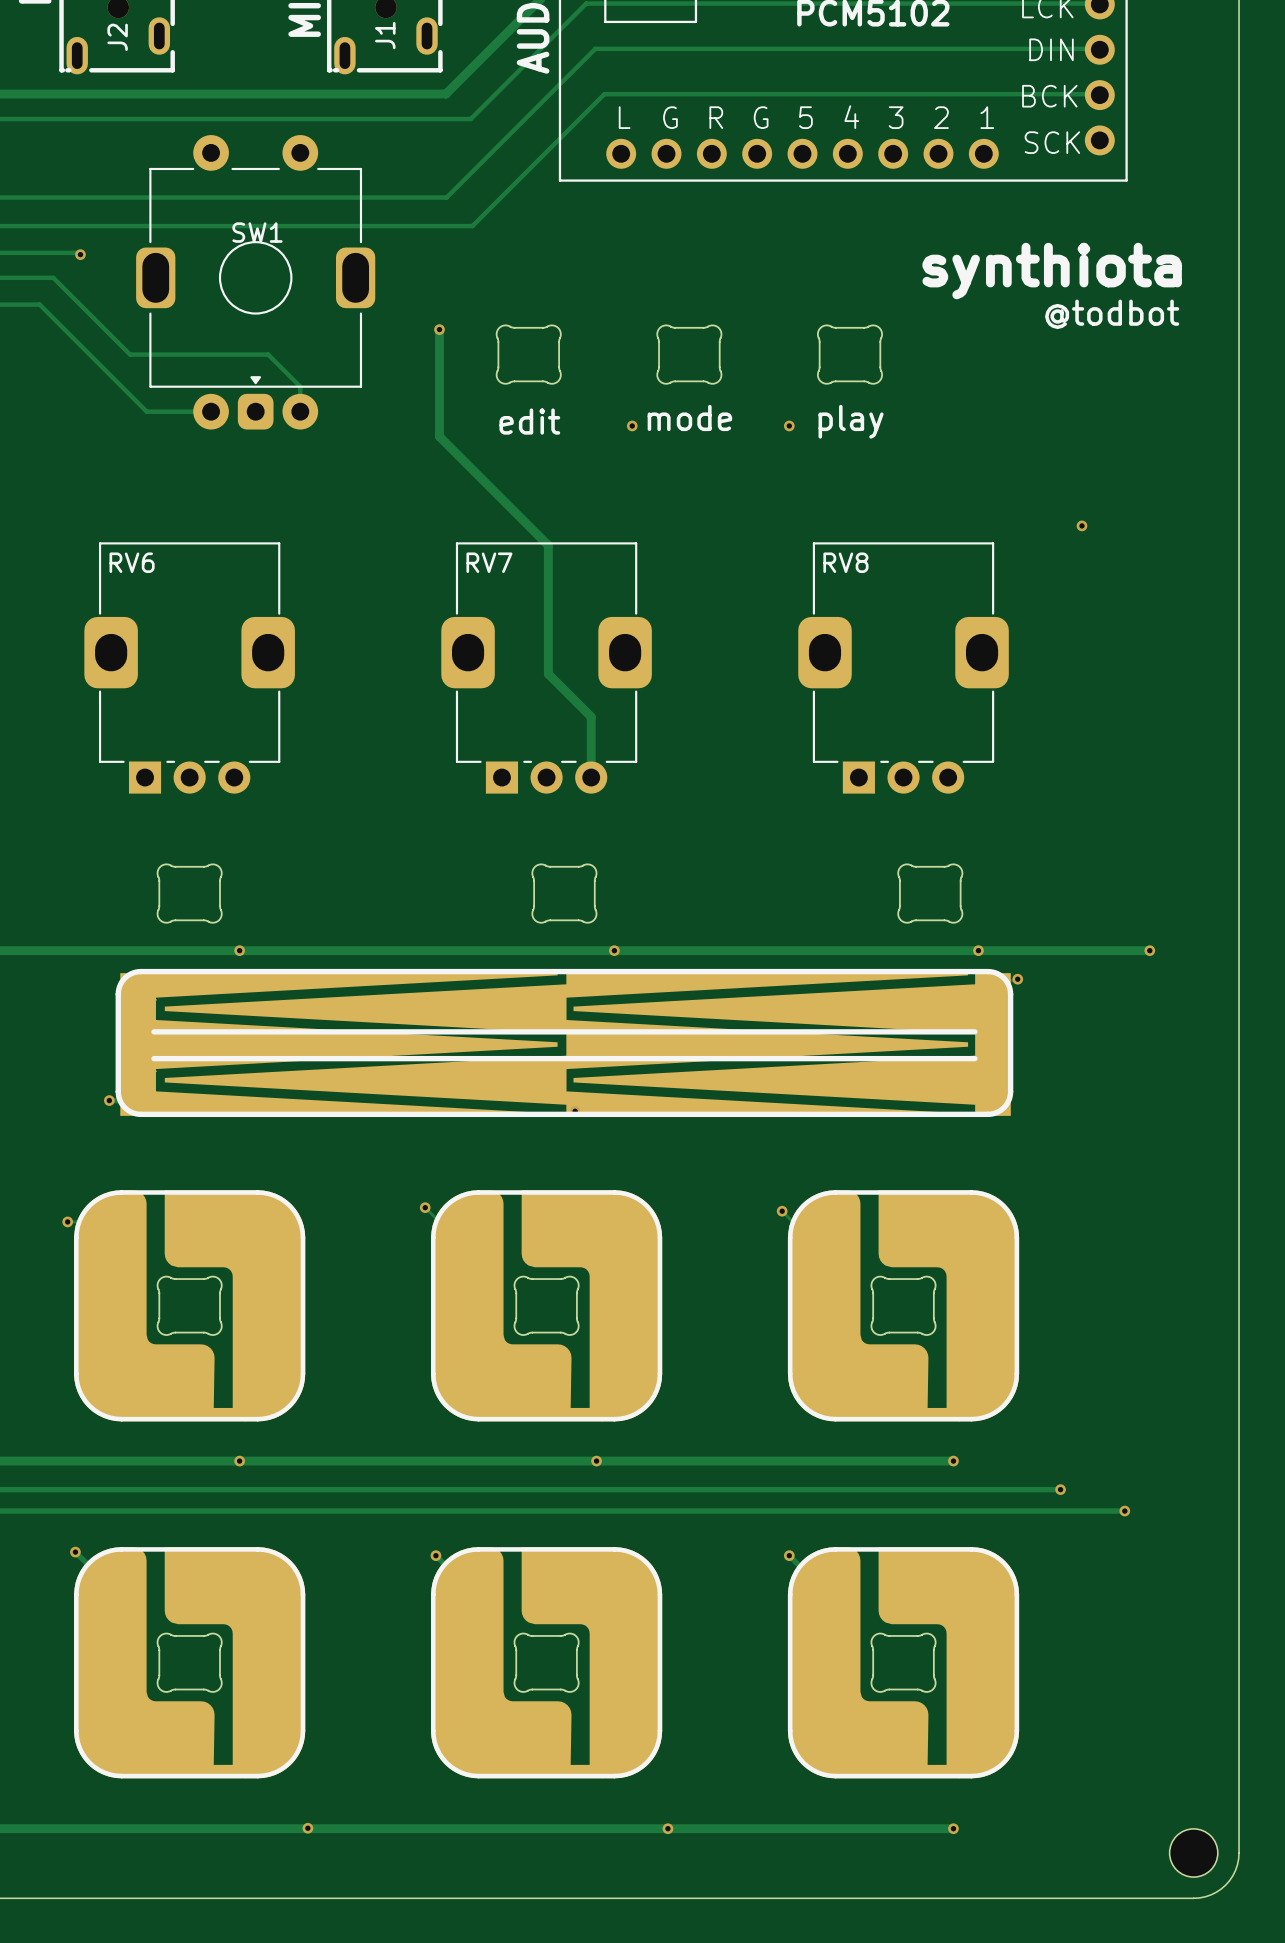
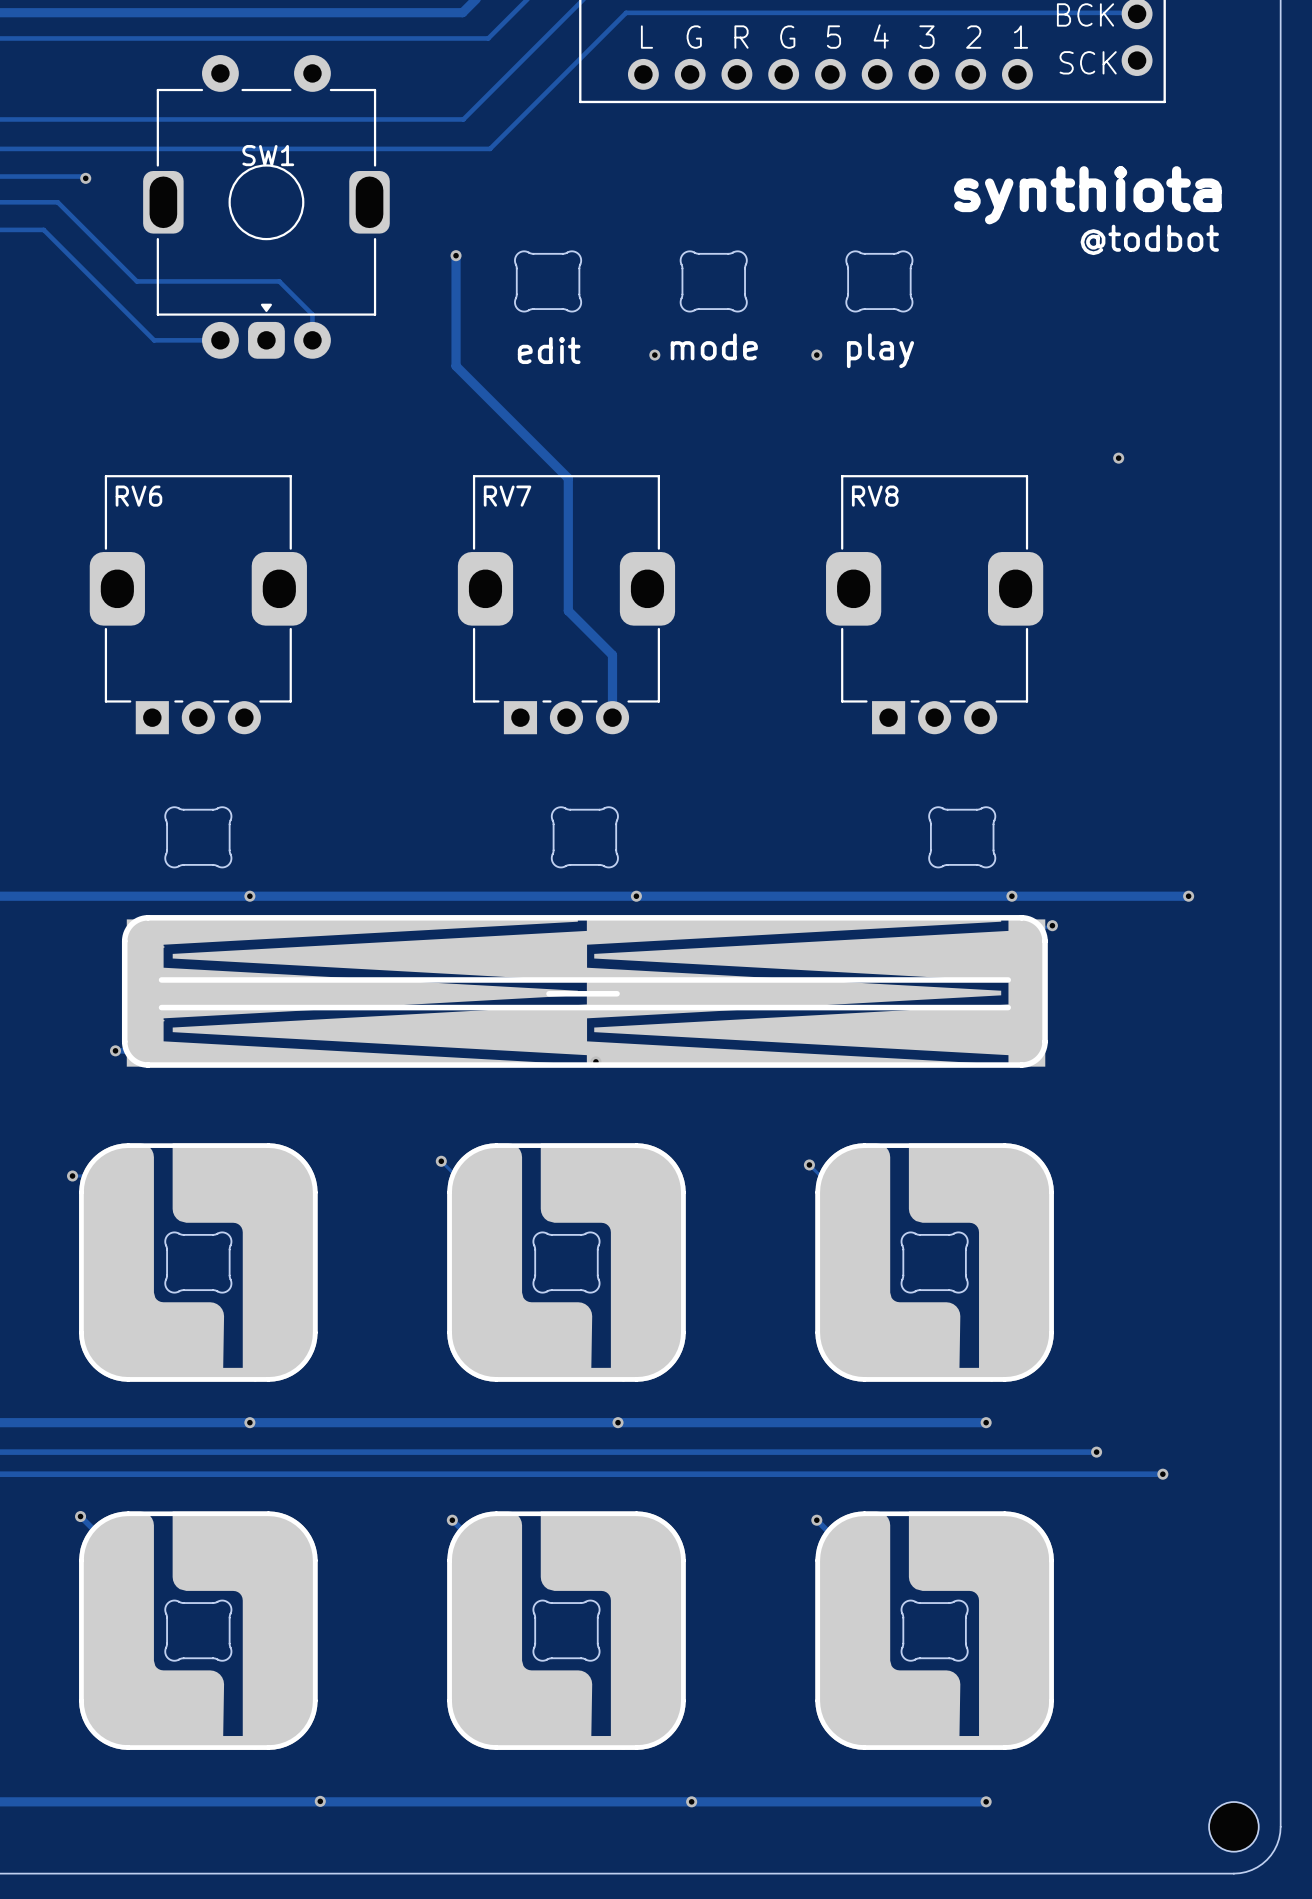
line: none -> (548, 993) (617, 993)

